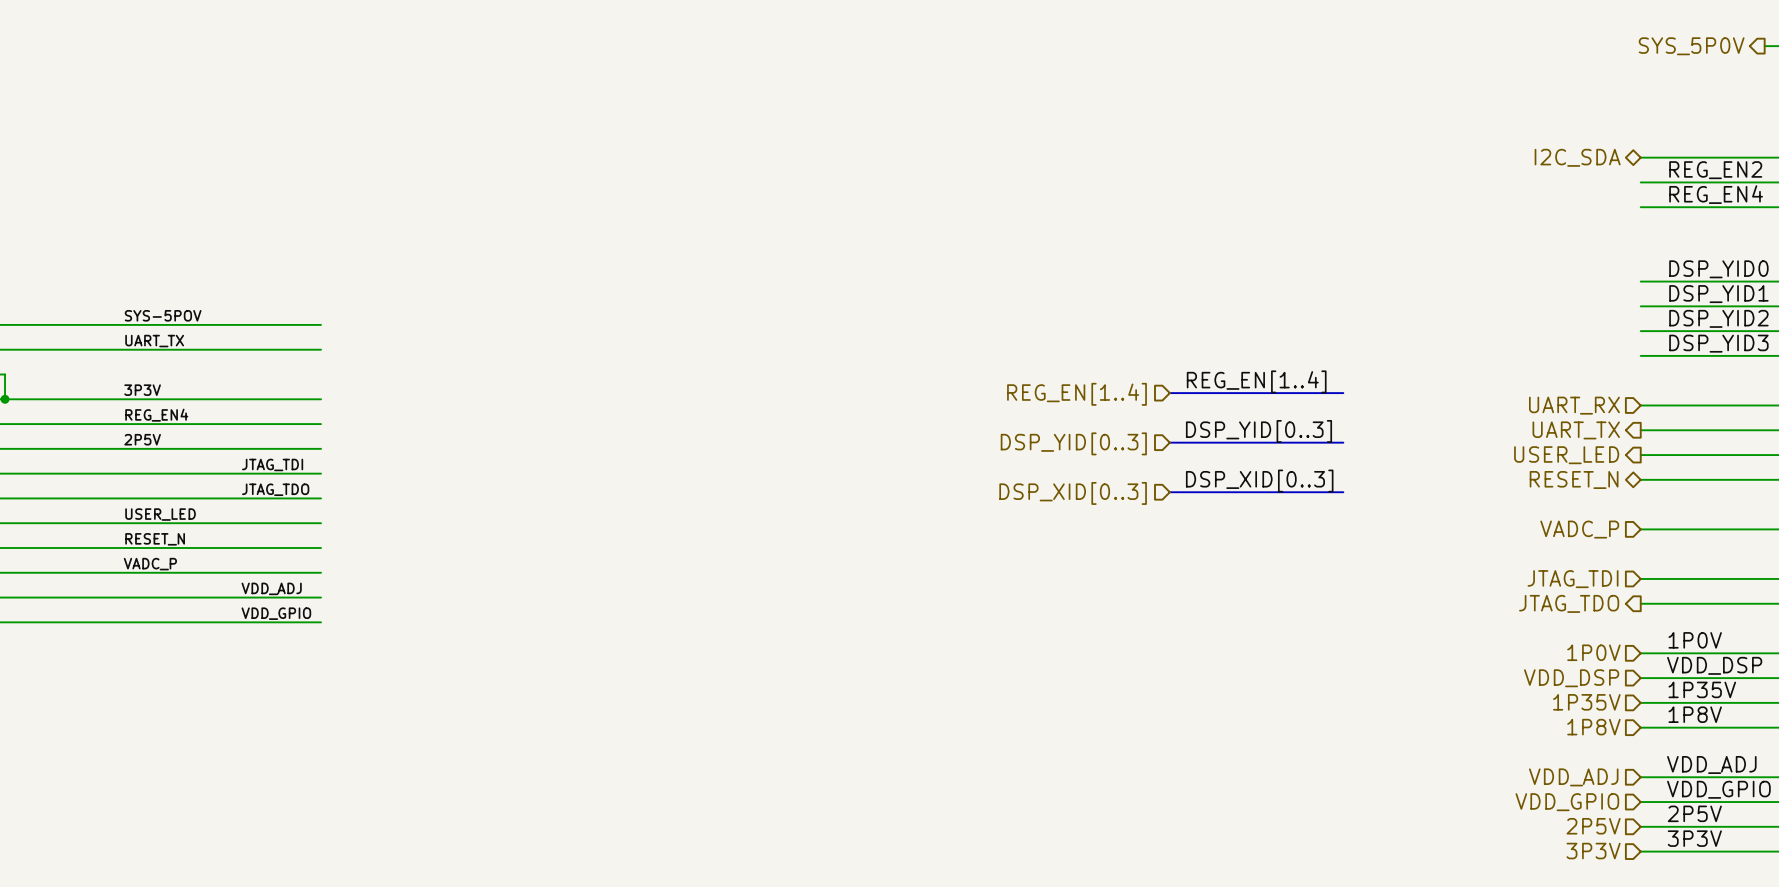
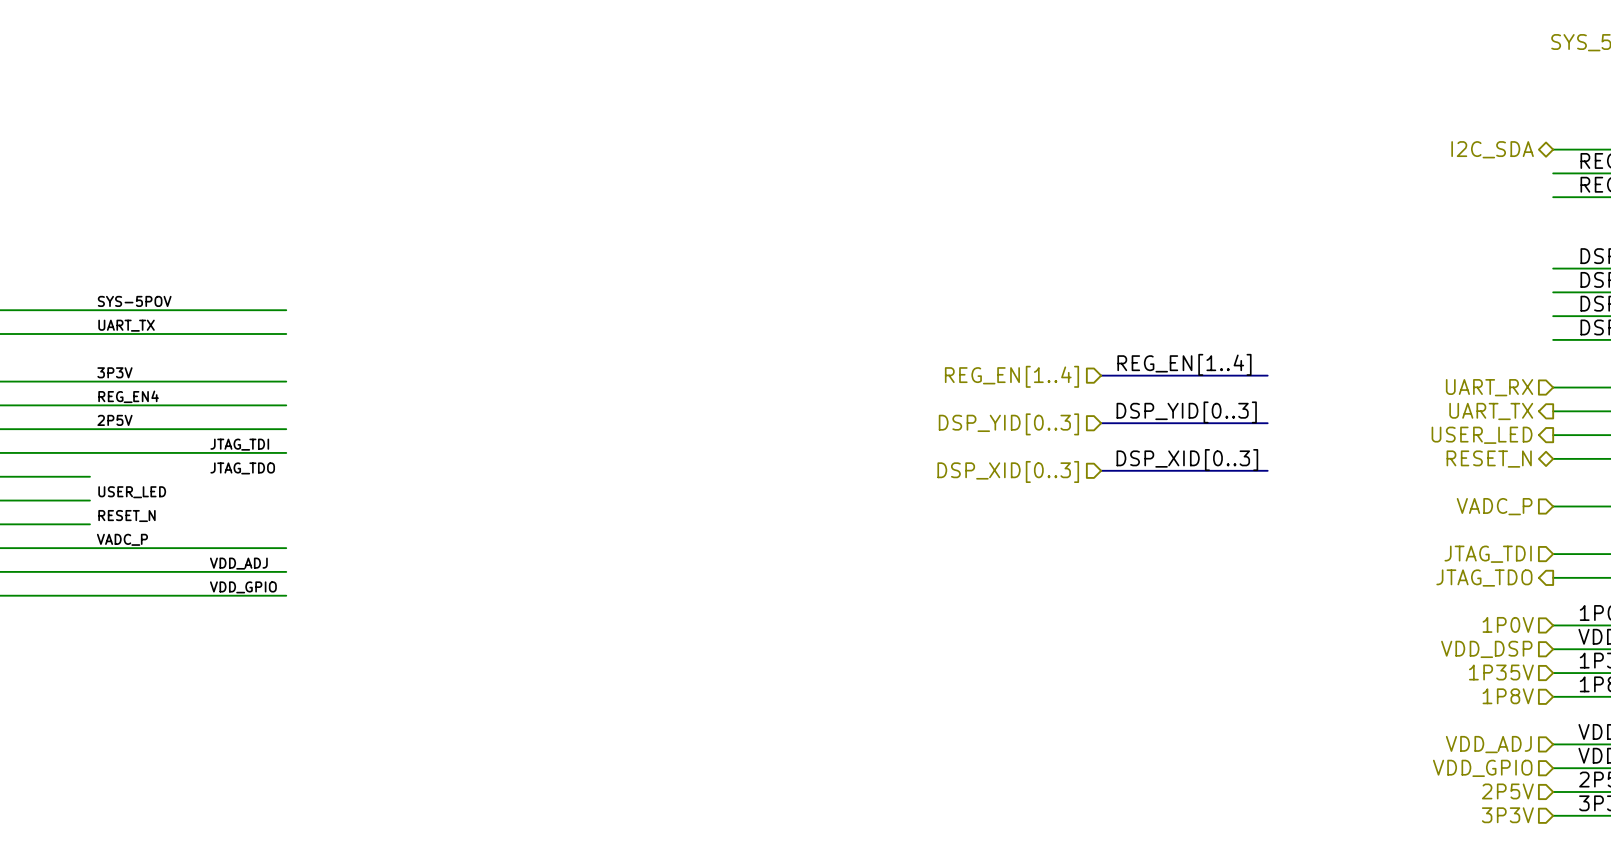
wire: (116, 498) (321, 498) -> none
wire: (116, 523) (321, 523) -> none
wire: (116, 547) (321, 547) -> none

